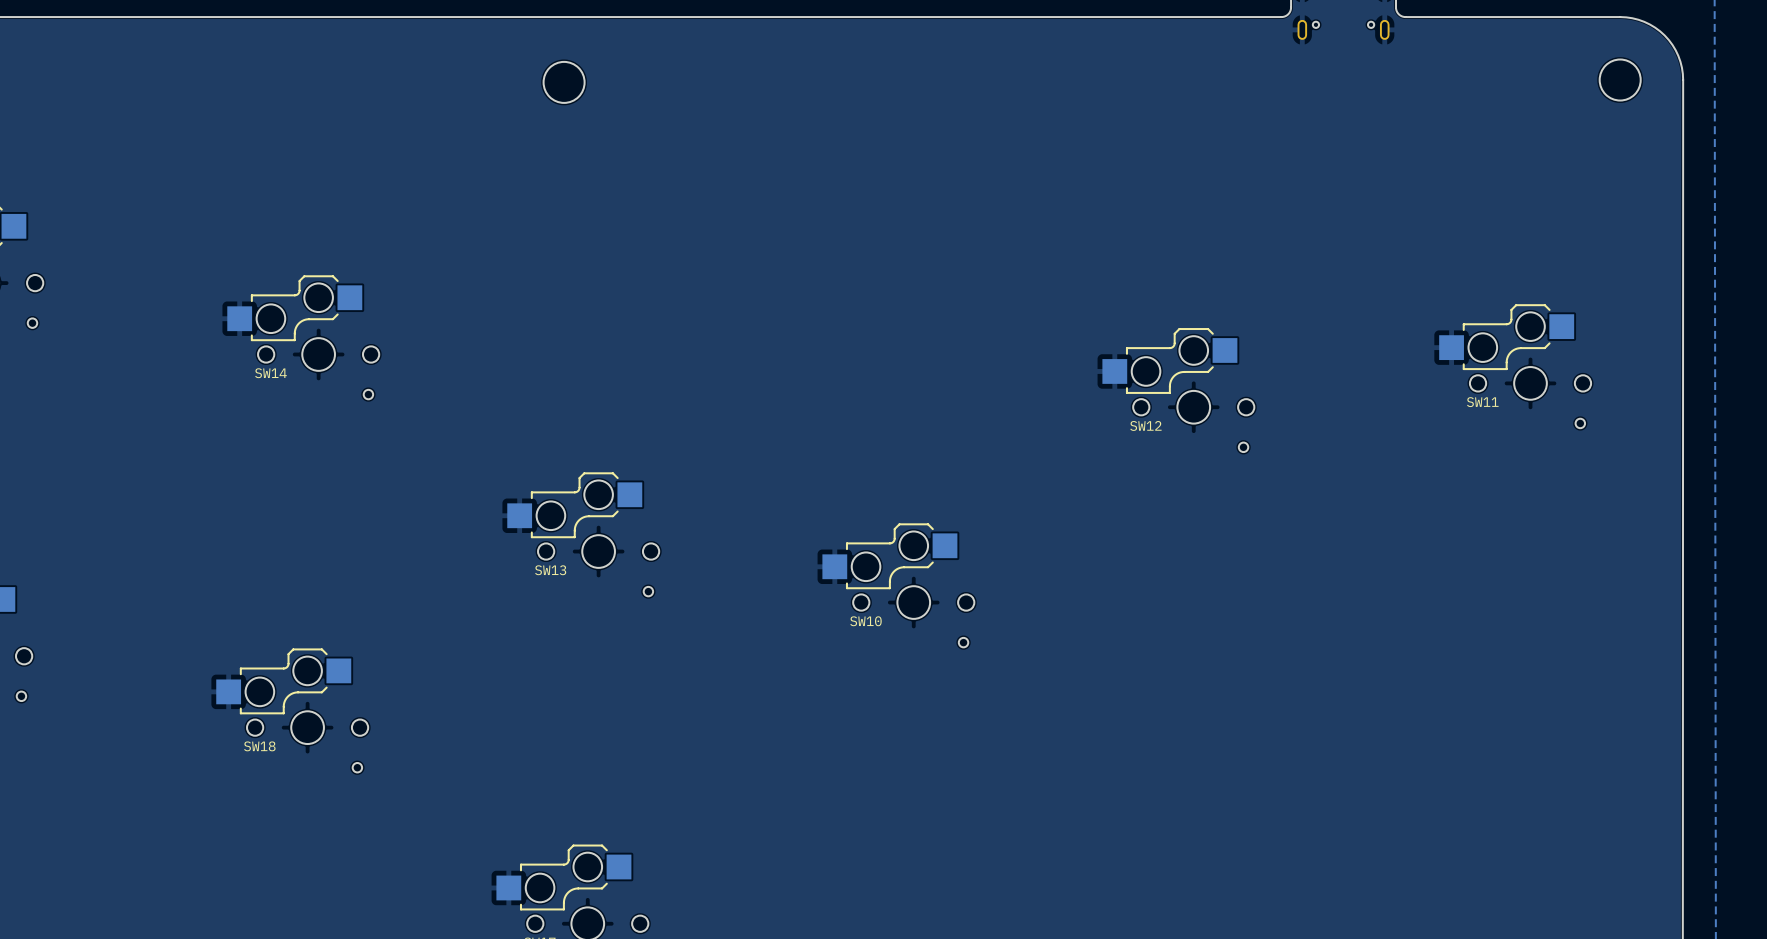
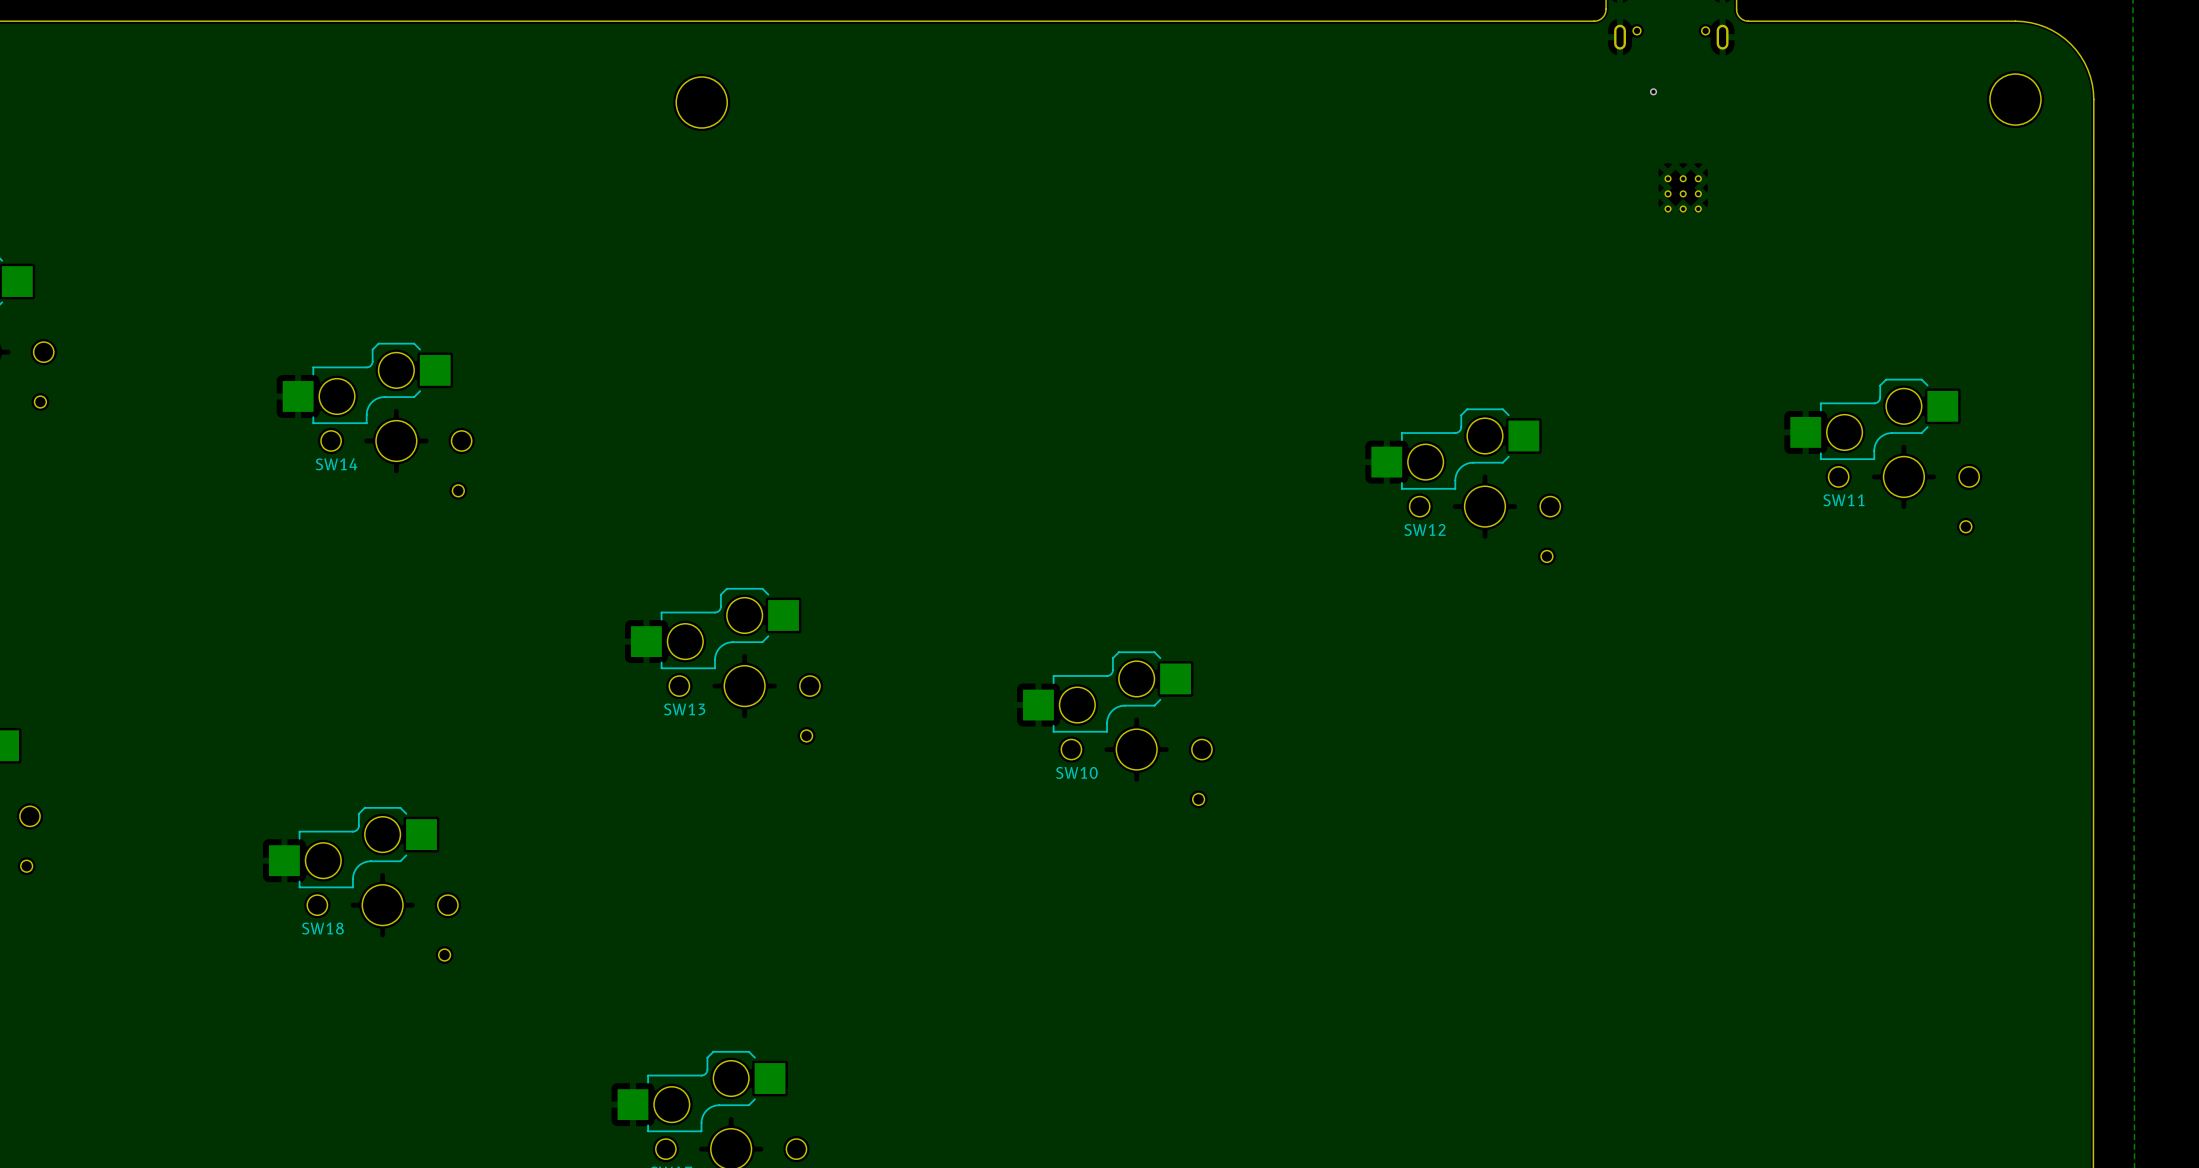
via: none -> (1653, 91)
part: none -> (1683, 193)

